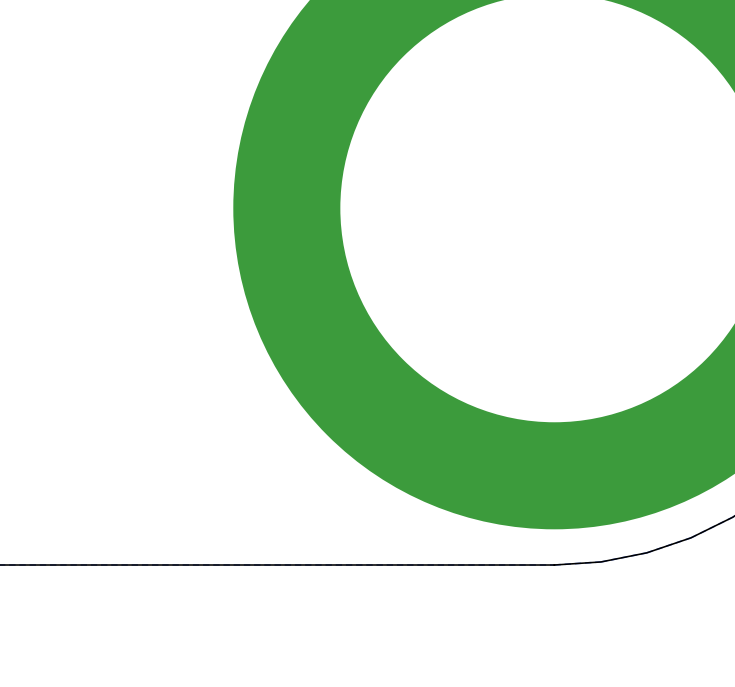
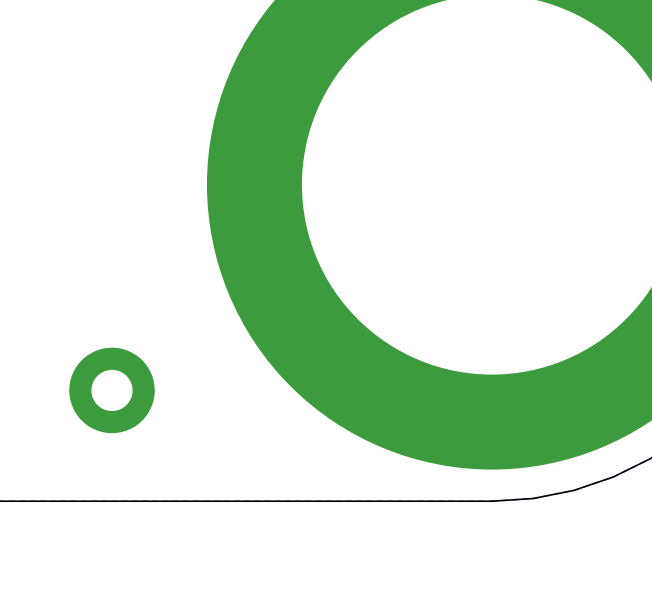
via: none -> (112, 390)

